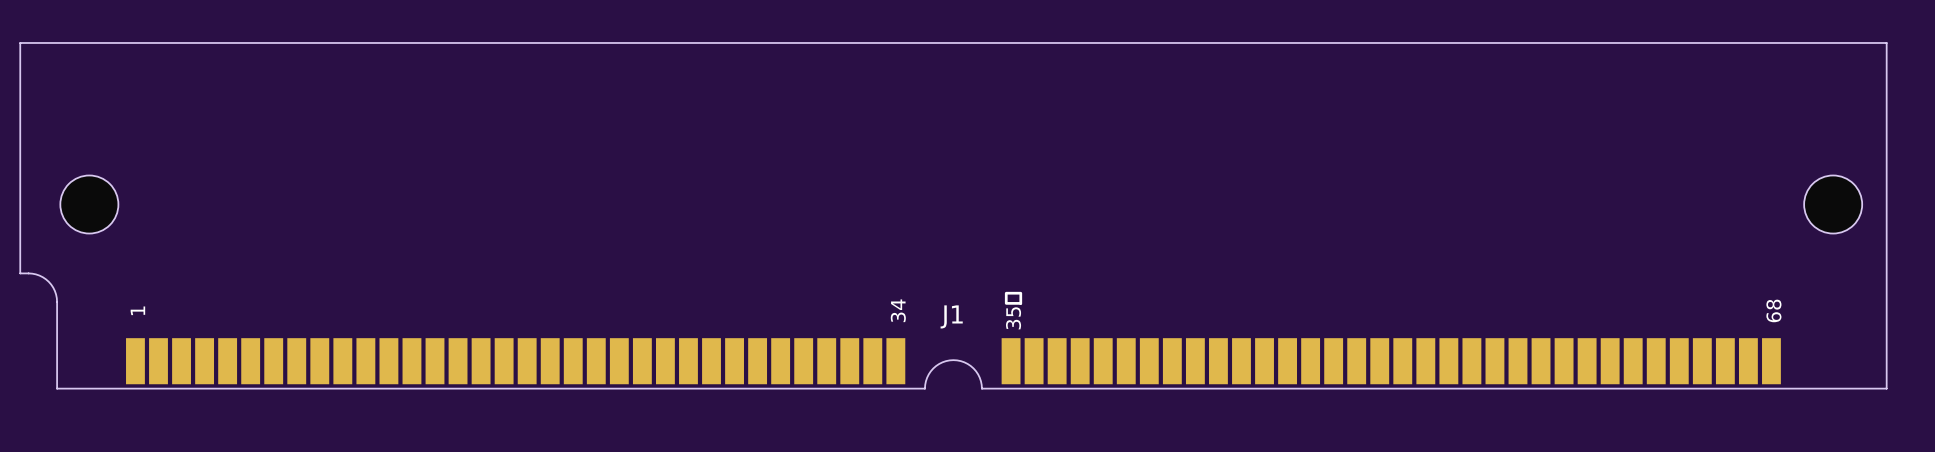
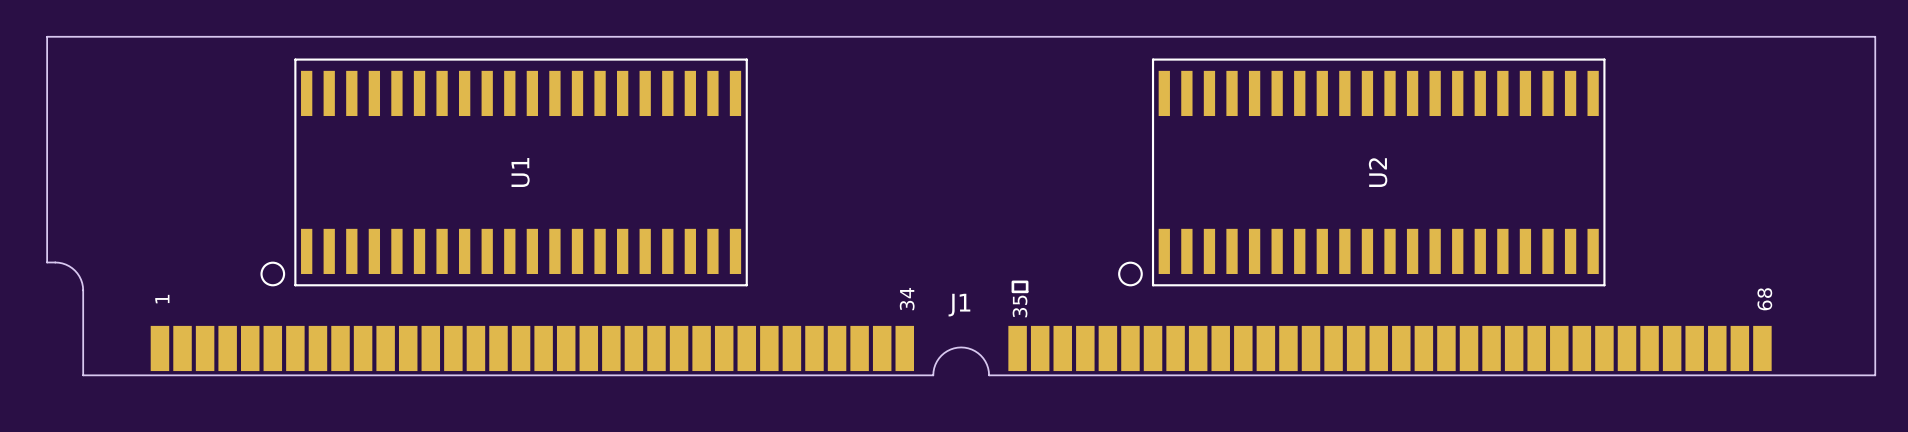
U1: none -> (504, 172)
U2: none -> (1361, 172)
part: (89, 204) -> none
part: (1833, 204) -> none

